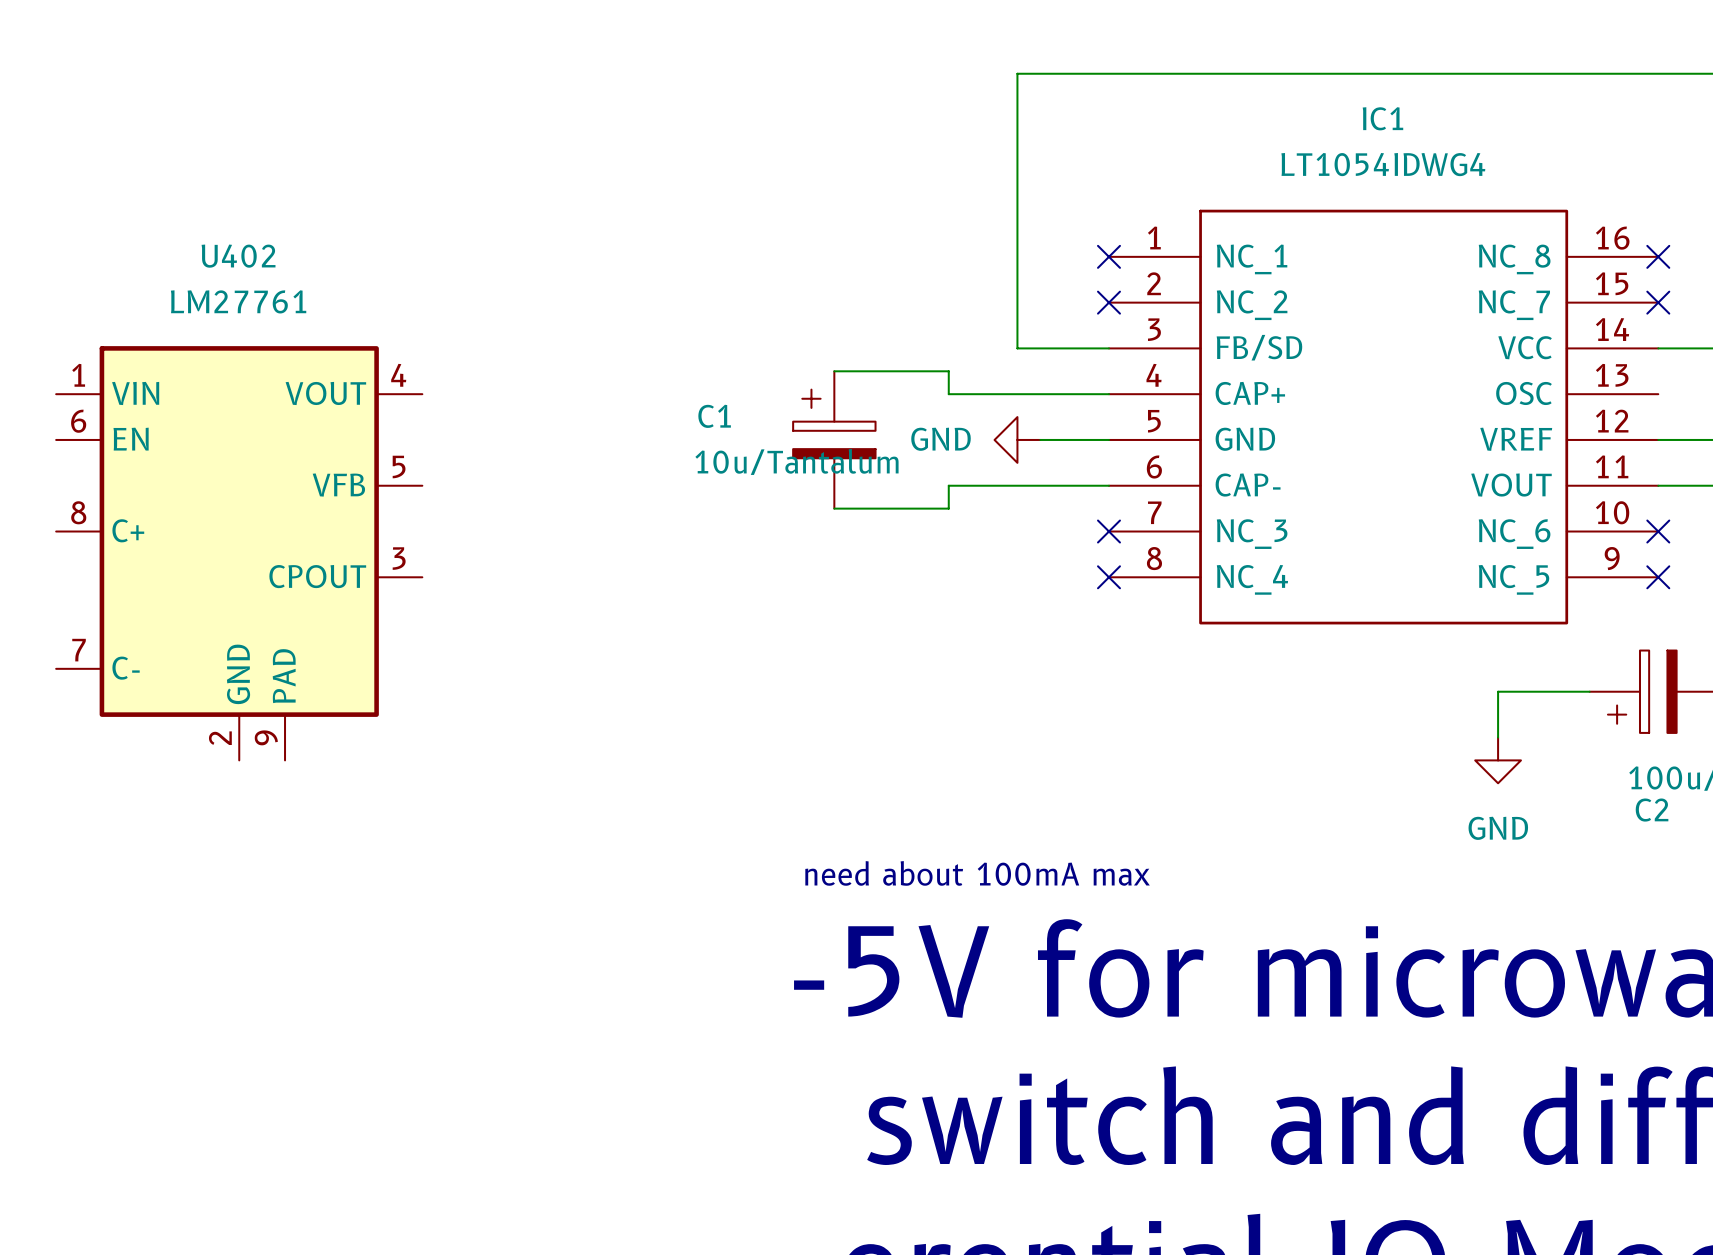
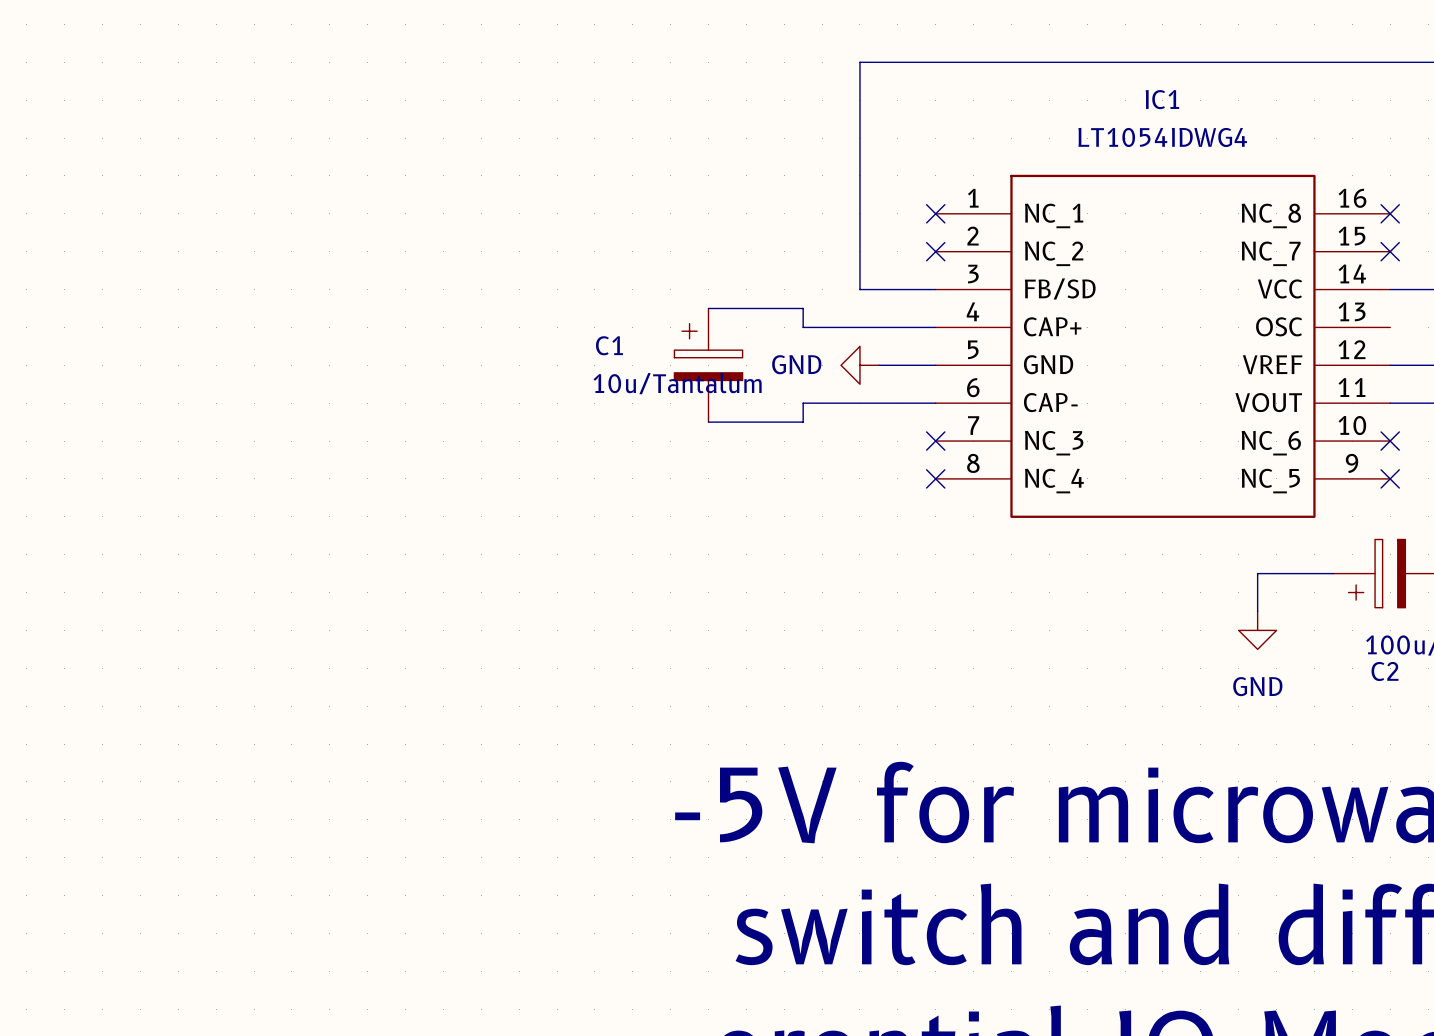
U402: LM27761 (239, 553) -> none
text: need about 100mA max (977, 873) -> none

